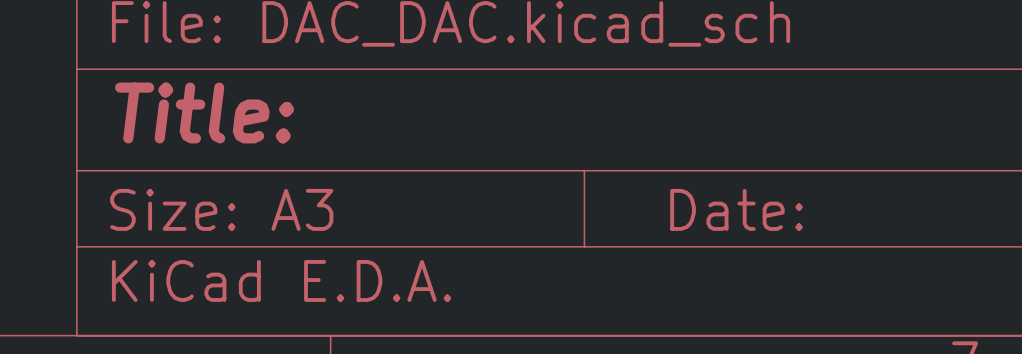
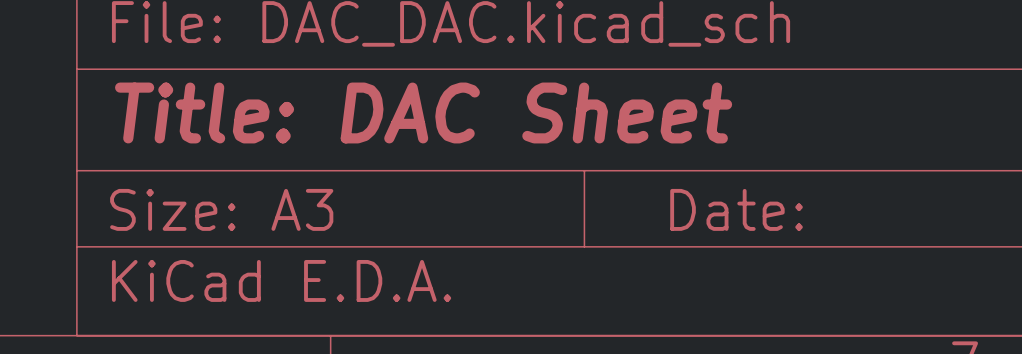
title block: Title: (204, 112) -> Title: DAC Sheet (423, 112)

